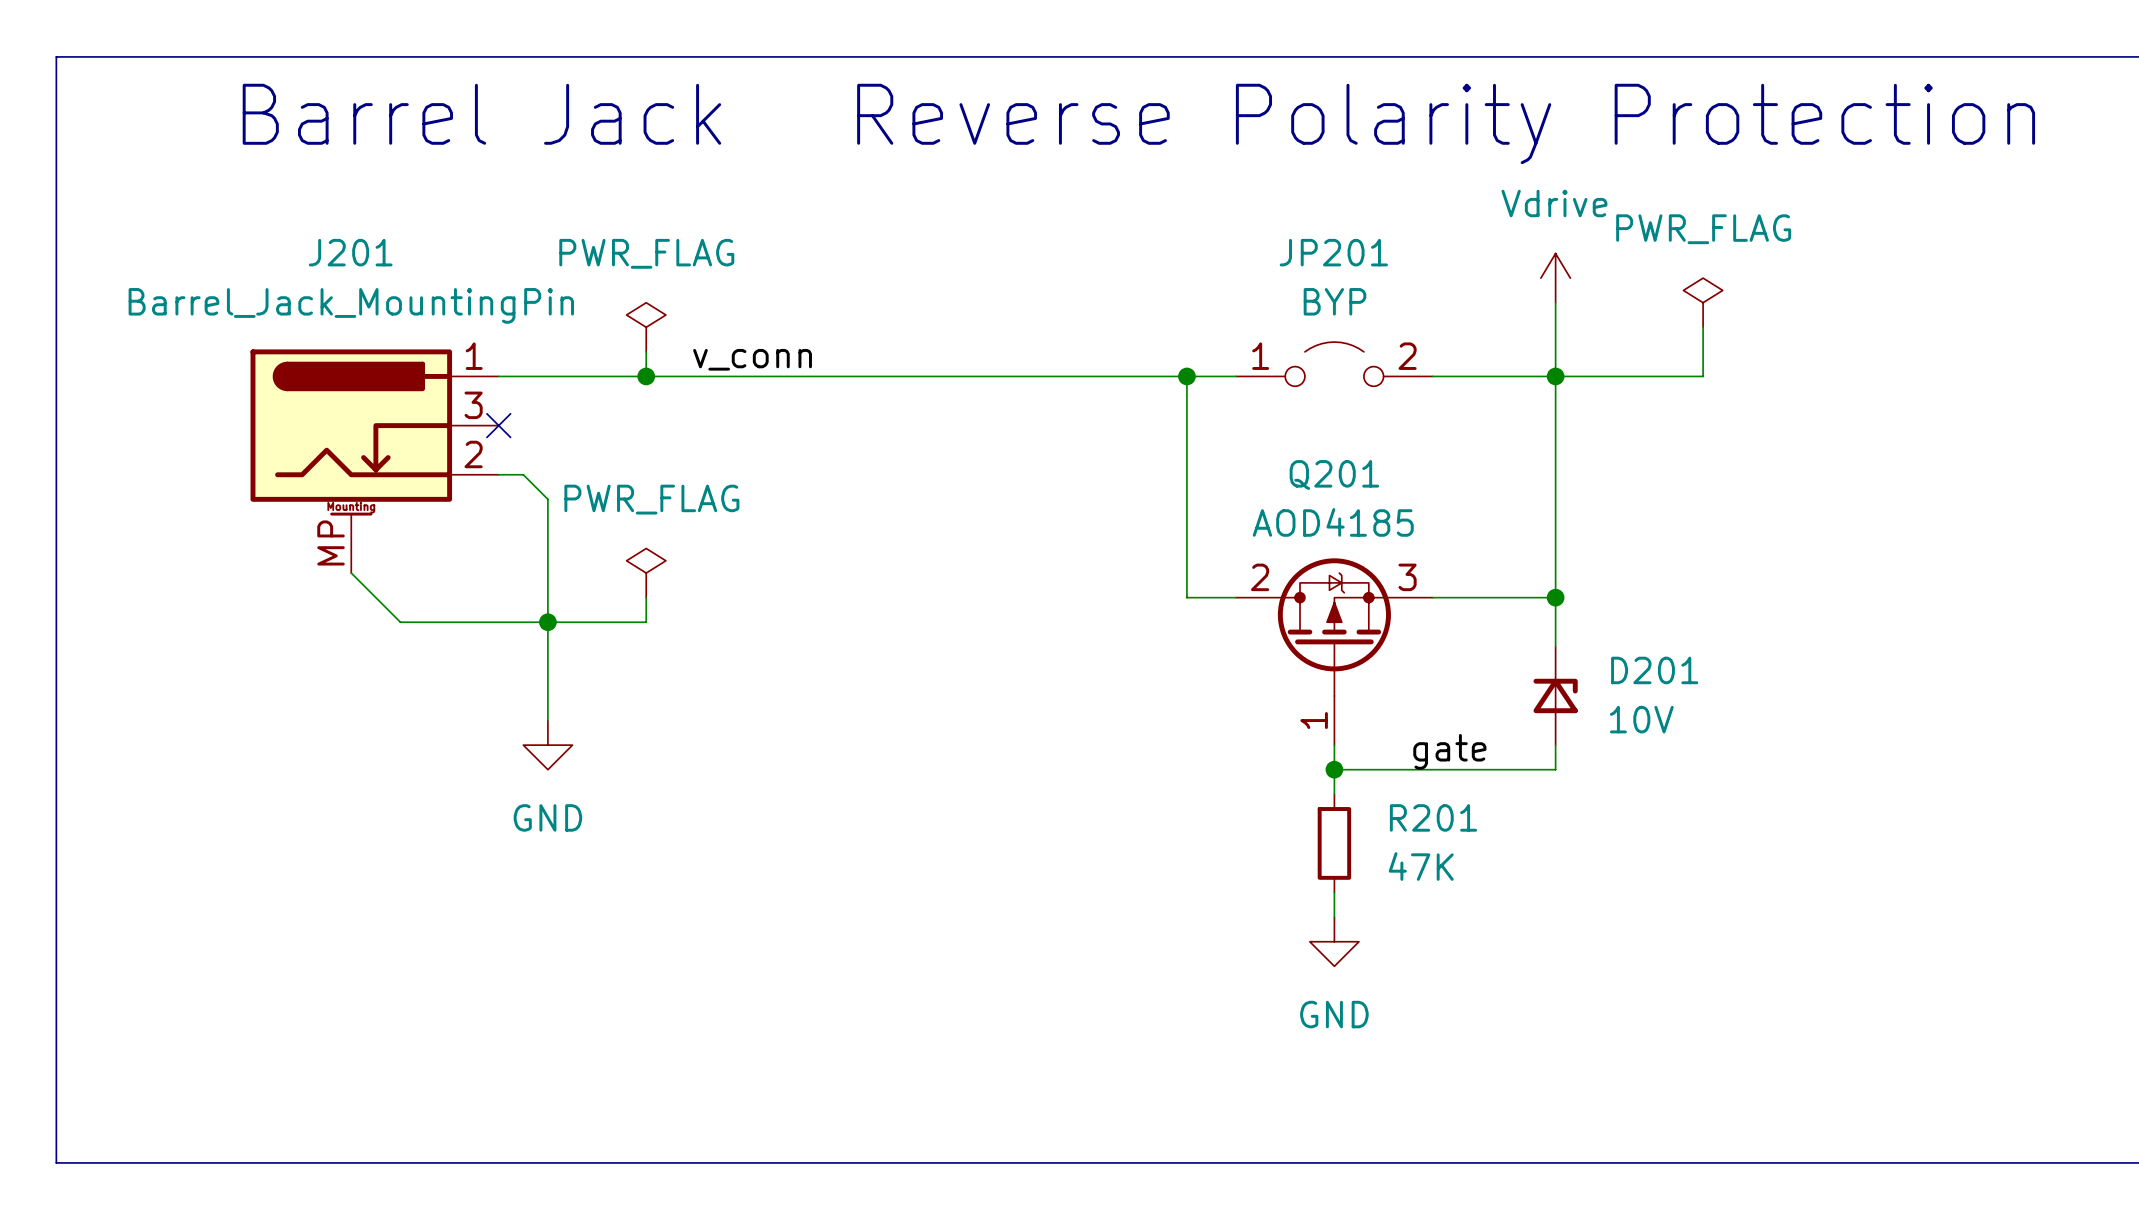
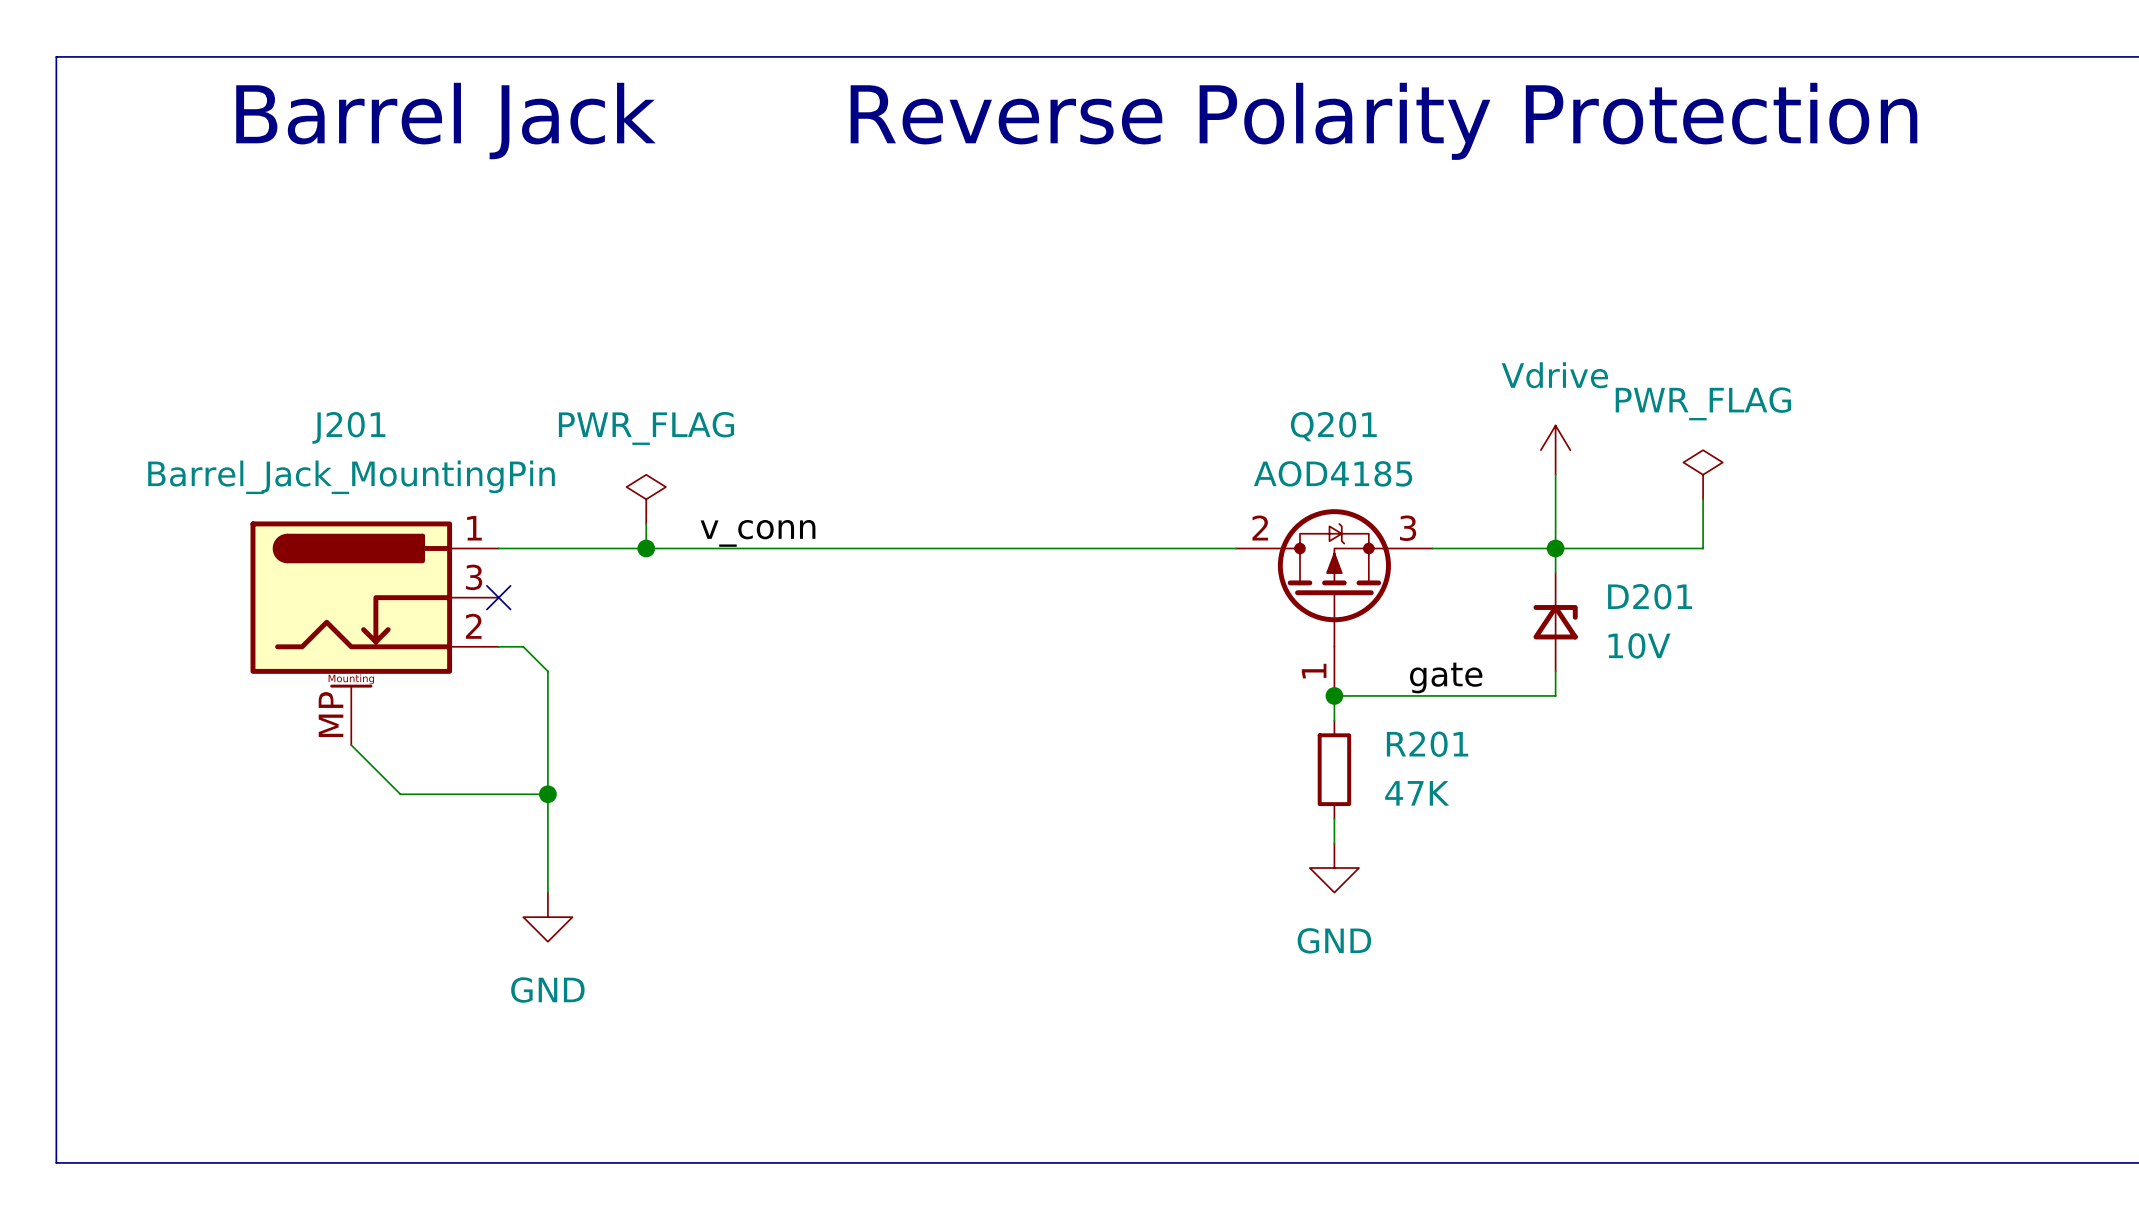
power symbol position: Vdrive (1555, 278) -> Vdrive (1555, 450)
wire: (1555, 302) (1555, 474) -> none
power symbol position: PWR_FLAG (1703, 302) -> PWR_FLAG (1703, 474)
power symbol: PWR_FLAG (646, 327) -> none
wire: (1703, 327) (1703, 376) (1432, 376) -> (1703, 499) (1703, 548) (1432, 548)
wire: (646, 351) (646, 376) -> (646, 523) (646, 548)
label position: v_conn (752, 359) -> v_conn (757, 533)
JP201: BYP (1334, 364) -> none
wire: (498, 376) (1236, 376) -> (498, 548) (1236, 548)
junction: (646, 376) -> none
wire: (1186, 376) (1186, 597) (1236, 597) -> none
junction: (1186, 376) -> none
junction: (1555, 376) -> none
no-connect mark: (498, 425) -> none
J201 position: (374, 461) -> (374, 633)
wire: (498, 474) (523, 474) (547, 499) (547, 671) -> (498, 646) (523, 646) (547, 671)
power symbol text position: PWR_FLAG (651, 499) -> PWR_FLAG (646, 428)
junction: none -> (646, 548)
wire: (351, 573) (400, 622) (646, 622) (646, 597) -> none
power symbol position: PWR_FLAG (646, 573) -> PWR_FLAG (646, 499)
no-connect mark: none -> (498, 597)
wire: (1432, 597) (1555, 597) -> none
junction position: (1555, 597) -> (1555, 548)
junction: (547, 622) -> none
Q201 position: (1334, 651) -> (1334, 602)
wire: none -> (1555, 671) (1555, 695) (1334, 695) (1334, 720)
D201 position: (1555, 695) -> (1555, 622)
wire: none -> (547, 720) (547, 892)
wire: none -> (351, 745) (400, 794) (547, 794)
power symbol position: GND (547, 745) -> GND (547, 917)
wire: (1334, 745) (1334, 794) -> none
wire: (1555, 745) (1555, 769) (1334, 769) -> none
label position: gate (1449, 751) -> gate (1446, 677)
junction position: (1334, 769) -> (1334, 695)
junction: none -> (547, 794)
R201 position: (1334, 843) -> (1334, 769)
wire: (1334, 892) (1334, 917) -> (1334, 818) (1334, 843)
power symbol position: GND (1334, 941) -> GND (1334, 868)

